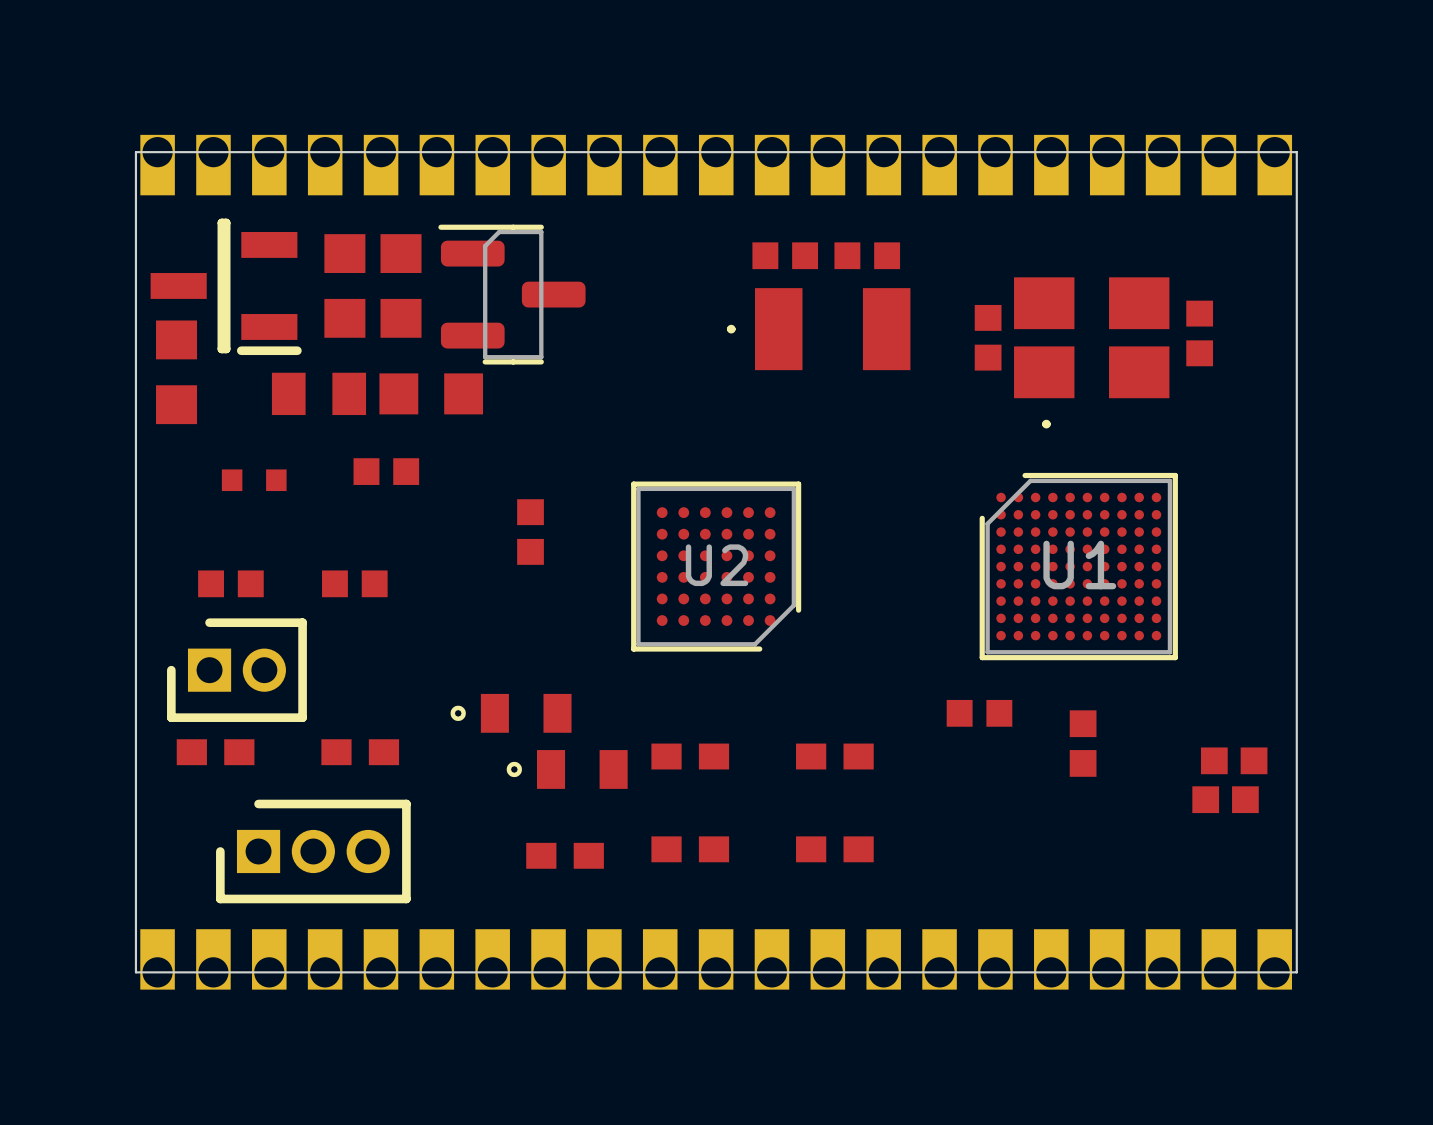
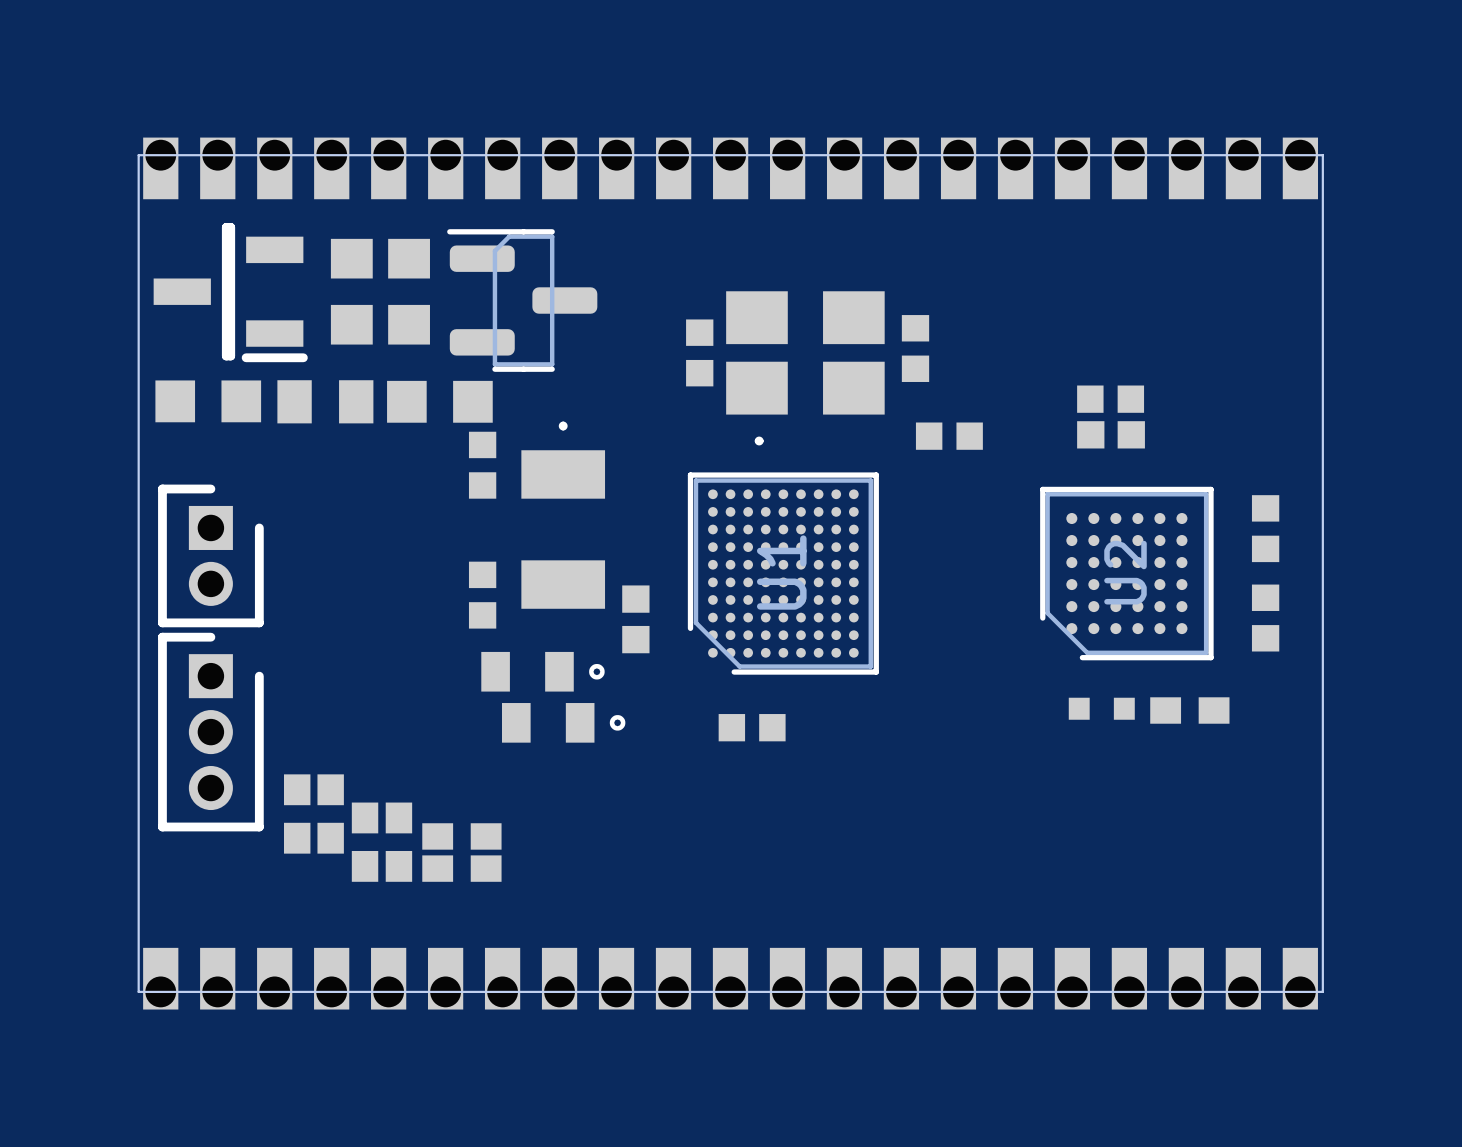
part: (785, 255) -> none
part: (867, 255) -> none
part: (818, 329) -> none
part: (1199, 333) -> none
part: (988, 337) -> none
part: none -> (915, 348)
part: none -> (699, 352)
part position: (1091, 352) -> (805, 368)
part rotation: 0° (176, 372) -> 90° clockwise (208, 401)
part: none -> (1110, 399)
part: none -> (1111, 434)
part: none -> (949, 436)
part: none -> (482, 465)
part: (386, 471) -> none
part position: (254, 480) -> (1101, 708)
part footprint: [517, 499, 544, 565] -> [521, 421, 606, 609]
part: none -> (1265, 528)
U2 rotation: 0° (716, 566) -> 90° clockwise (1126, 573)
U2 position: (716, 566) -> (1126, 573)
U1 rotation: 0° (1078, 566) -> 90° counterclockwise (783, 573)
U1 position: (1078, 566) -> (783, 573)
part: (230, 583) -> none
part: (354, 583) -> none
part: none -> (482, 595)
part: none -> (1265, 618)
part: none -> (635, 619)
part: none -> (542, 671)
part rotation: 0° (236, 670) -> 90° clockwise (210, 555)
part position: (236, 670) -> (210, 555)
part: none -> (1189, 710)
part: none -> (563, 722)
part: (511, 713) -> none
part: none -> (752, 727)
part: (979, 713) -> none
part: (1083, 743) -> none
part: (215, 752) -> none
part: (360, 752) -> none
part: (690, 756) -> none
part: (834, 756) -> none
part: (1234, 760) -> none
part: (567, 769) -> none
part: none -> (297, 813)
part: none -> (330, 813)
part: (1225, 799) -> none
part: none -> (461, 836)
part: none -> (365, 842)
part: none -> (398, 842)
part: (690, 849) -> none
part: (834, 849) -> none
part rotation: 0° (313, 851) -> 90° clockwise (210, 732)
part position: (313, 851) -> (210, 732)
part: none -> (461, 868)
part: (565, 855) -> none

